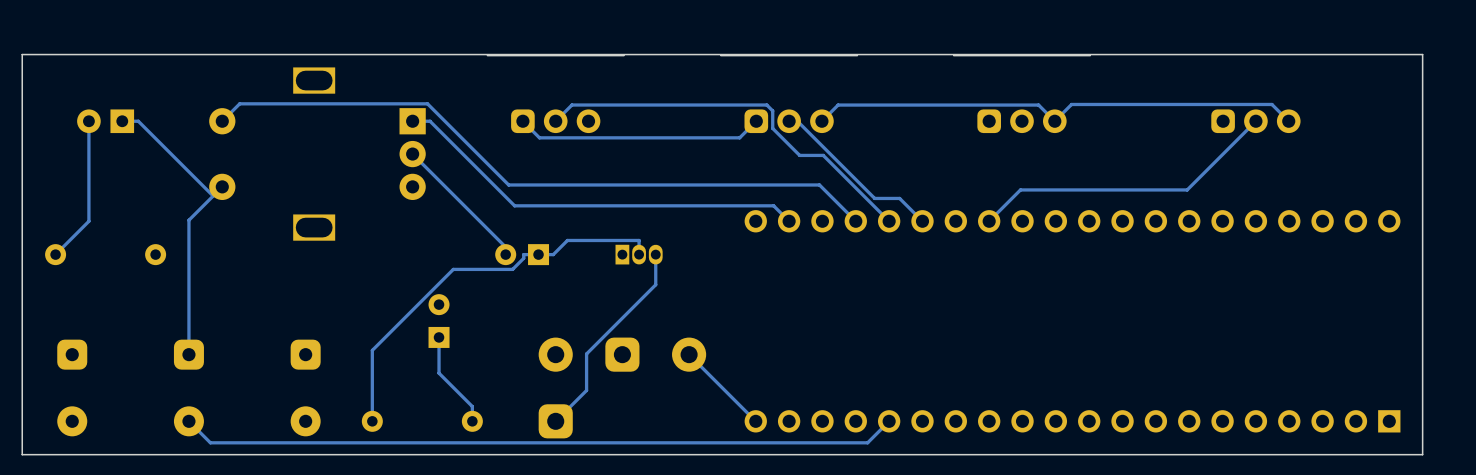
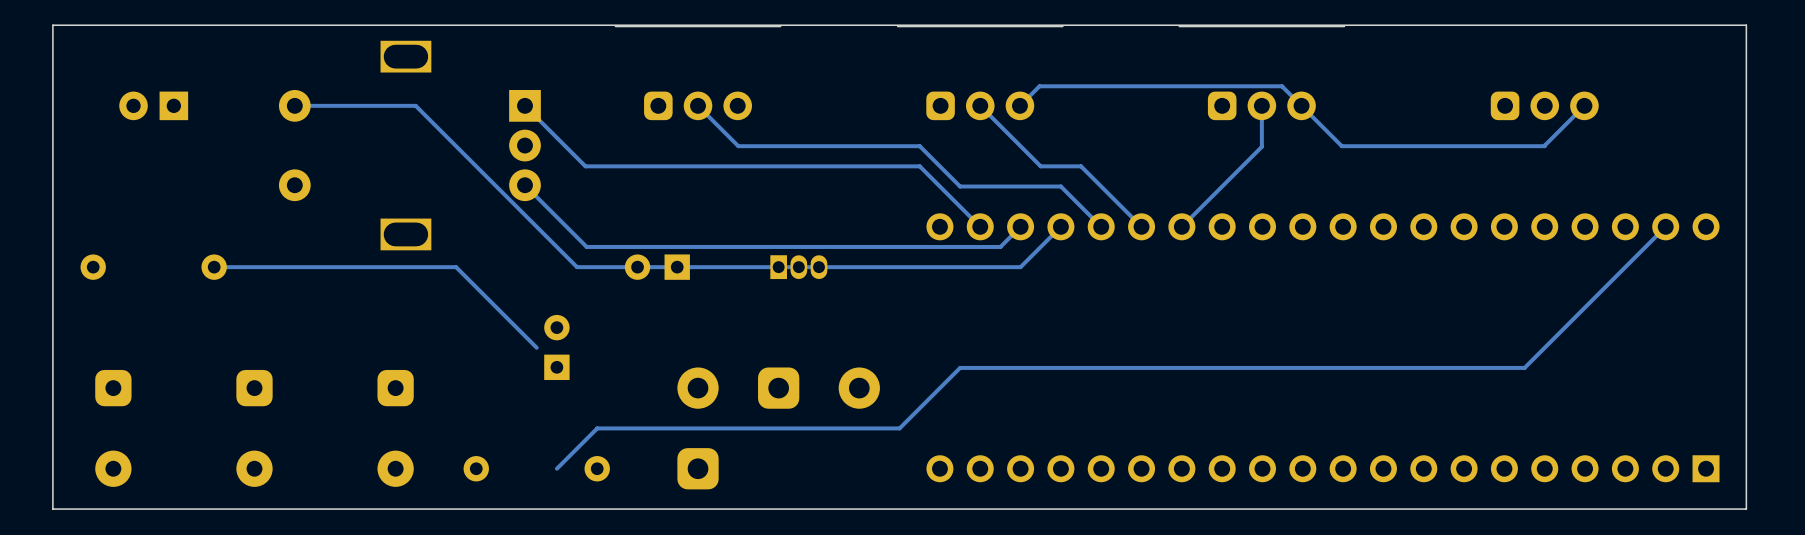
track: (88, 121) (88, 221) (55, 254) -> none
track: (122, 121) (138, 121) (213, 196) -> none
track: (222, 121) (239, 103) (427, 103) (508, 184) (819, 184) (855, 221) -> (294, 105) (415, 105) (577, 267) (659, 267)
track: (412, 121) (430, 121) (514, 205) (773, 205) -> (524, 105) (585, 166) (919, 166) (961, 208)
track: (555, 121) (571, 105) (766, 105) (772, 110) (772, 128) (799, 155) (823, 155) -> (698, 105) (738, 146) (919, 146) (960, 186) (1060, 186)
track: (756, 121) (739, 137) (539, 137) (522, 121) -> none
track: (789, 121) (797, 121) (874, 198) (899, 198) -> (980, 105) (1021, 147)
track: none -> (1261, 105) (1261, 146) (1181, 226)
track: (1255, 121) (1187, 189) (1020, 189) (989, 221) -> none
track: (1288, 121) (1271, 104) (1071, 104) (1054, 121) -> (1584, 105) (1544, 146) (1341, 146) (1301, 105)
track: (412, 154) (505, 247) (505, 254) -> none
track: (839, 171) (855, 187) -> (1040, 166) (1081, 166) (1113, 199)
track: none -> (524, 185) (586, 246) (1000, 246) (1020, 226)
track: (213, 196) (188, 220) (188, 354) -> none
track: none -> (1665, 226) (1524, 367) (960, 367) (899, 428) (597, 428) (556, 468)
track: none -> (214, 267) (456, 267) (536, 347)
track: (523, 254) (523, 258) (512, 269) (453, 269) (372, 350) (372, 421) -> none
track: (639, 254) (639, 240) (567, 240) (553, 254) -> (1060, 226) (1020, 267) (695, 267)
track: (655, 254) (655, 284) (586, 353) (586, 390) (555, 421) -> none
track: (439, 337) (439, 373) (472, 406) (472, 421) -> none
track: (689, 354) (755, 421) -> none
track: (889, 421) (867, 442) (210, 442) (188, 421) -> none

